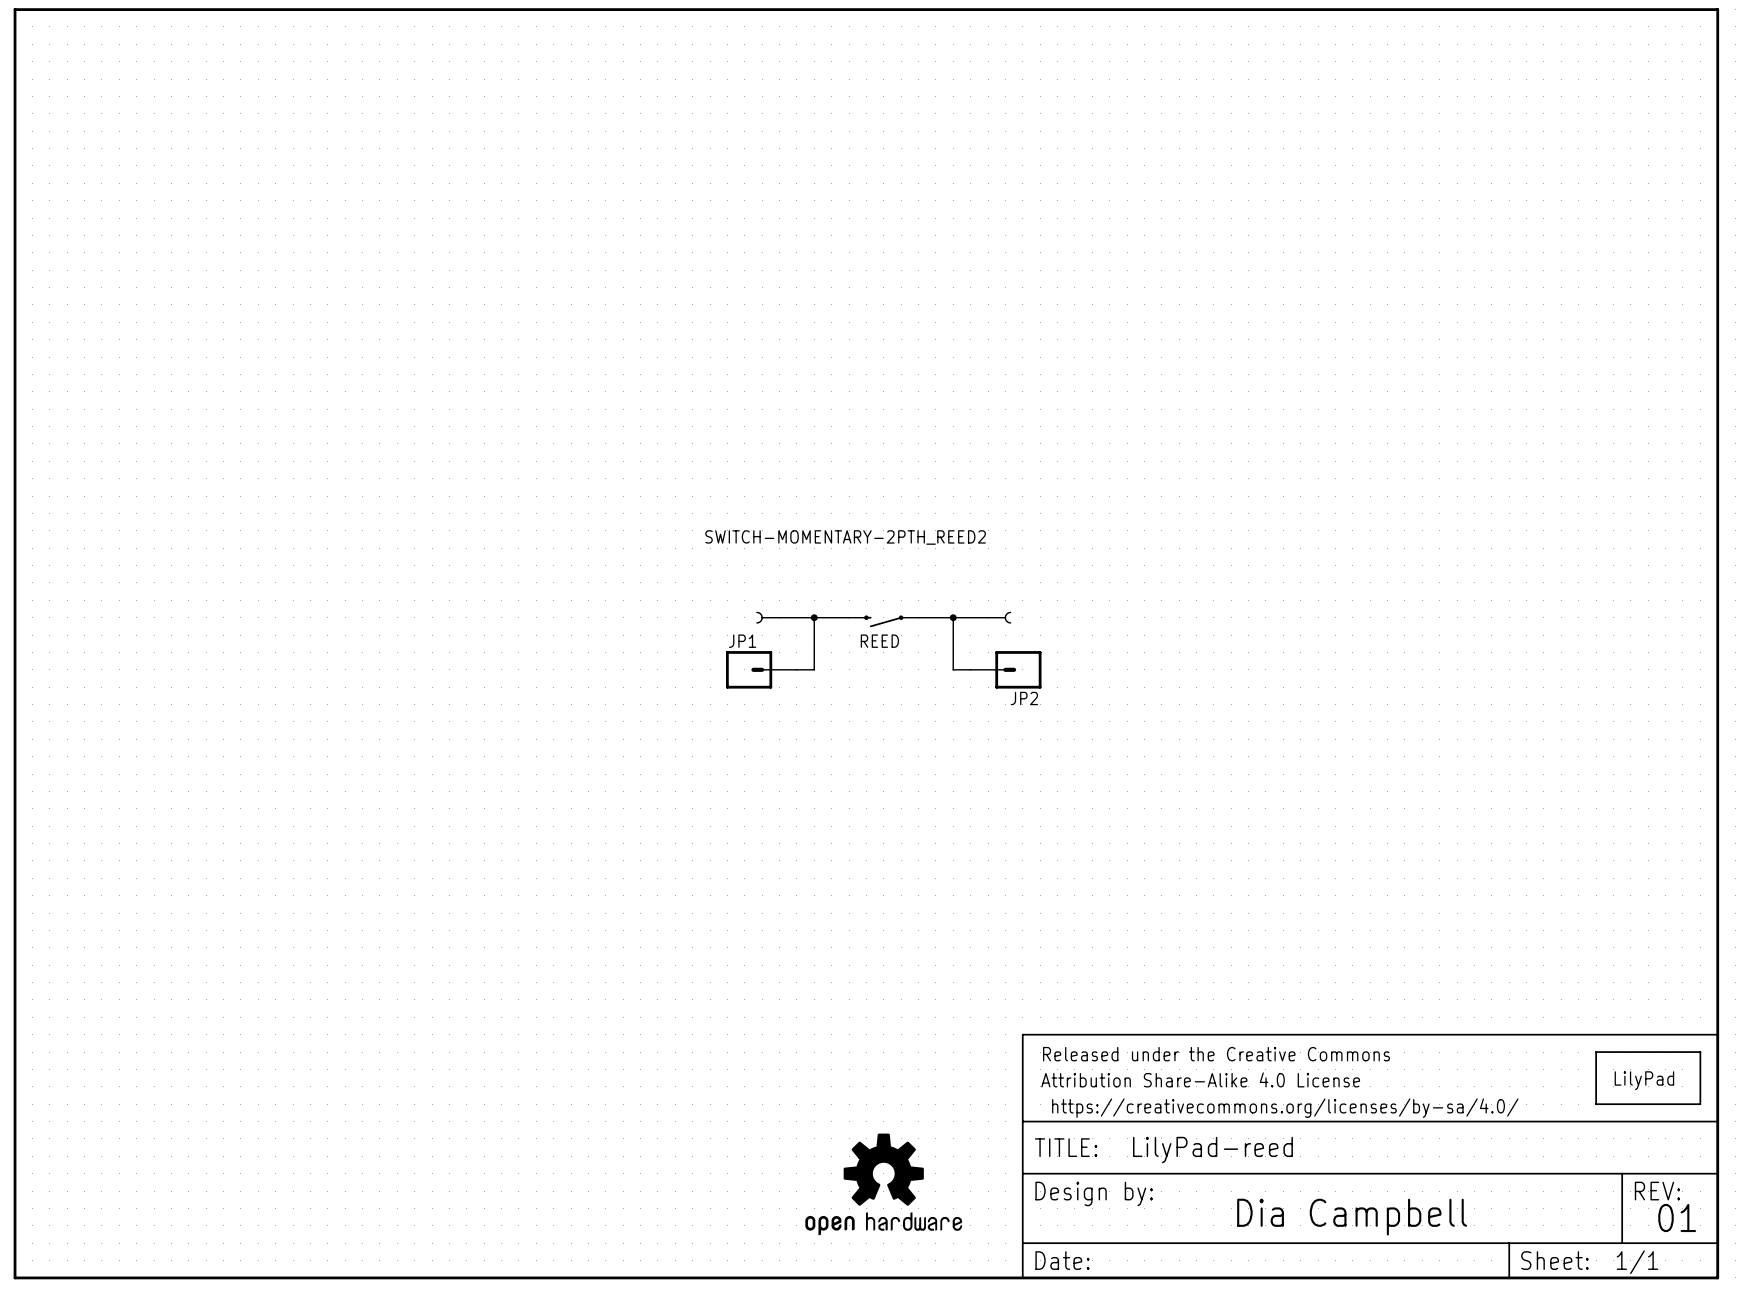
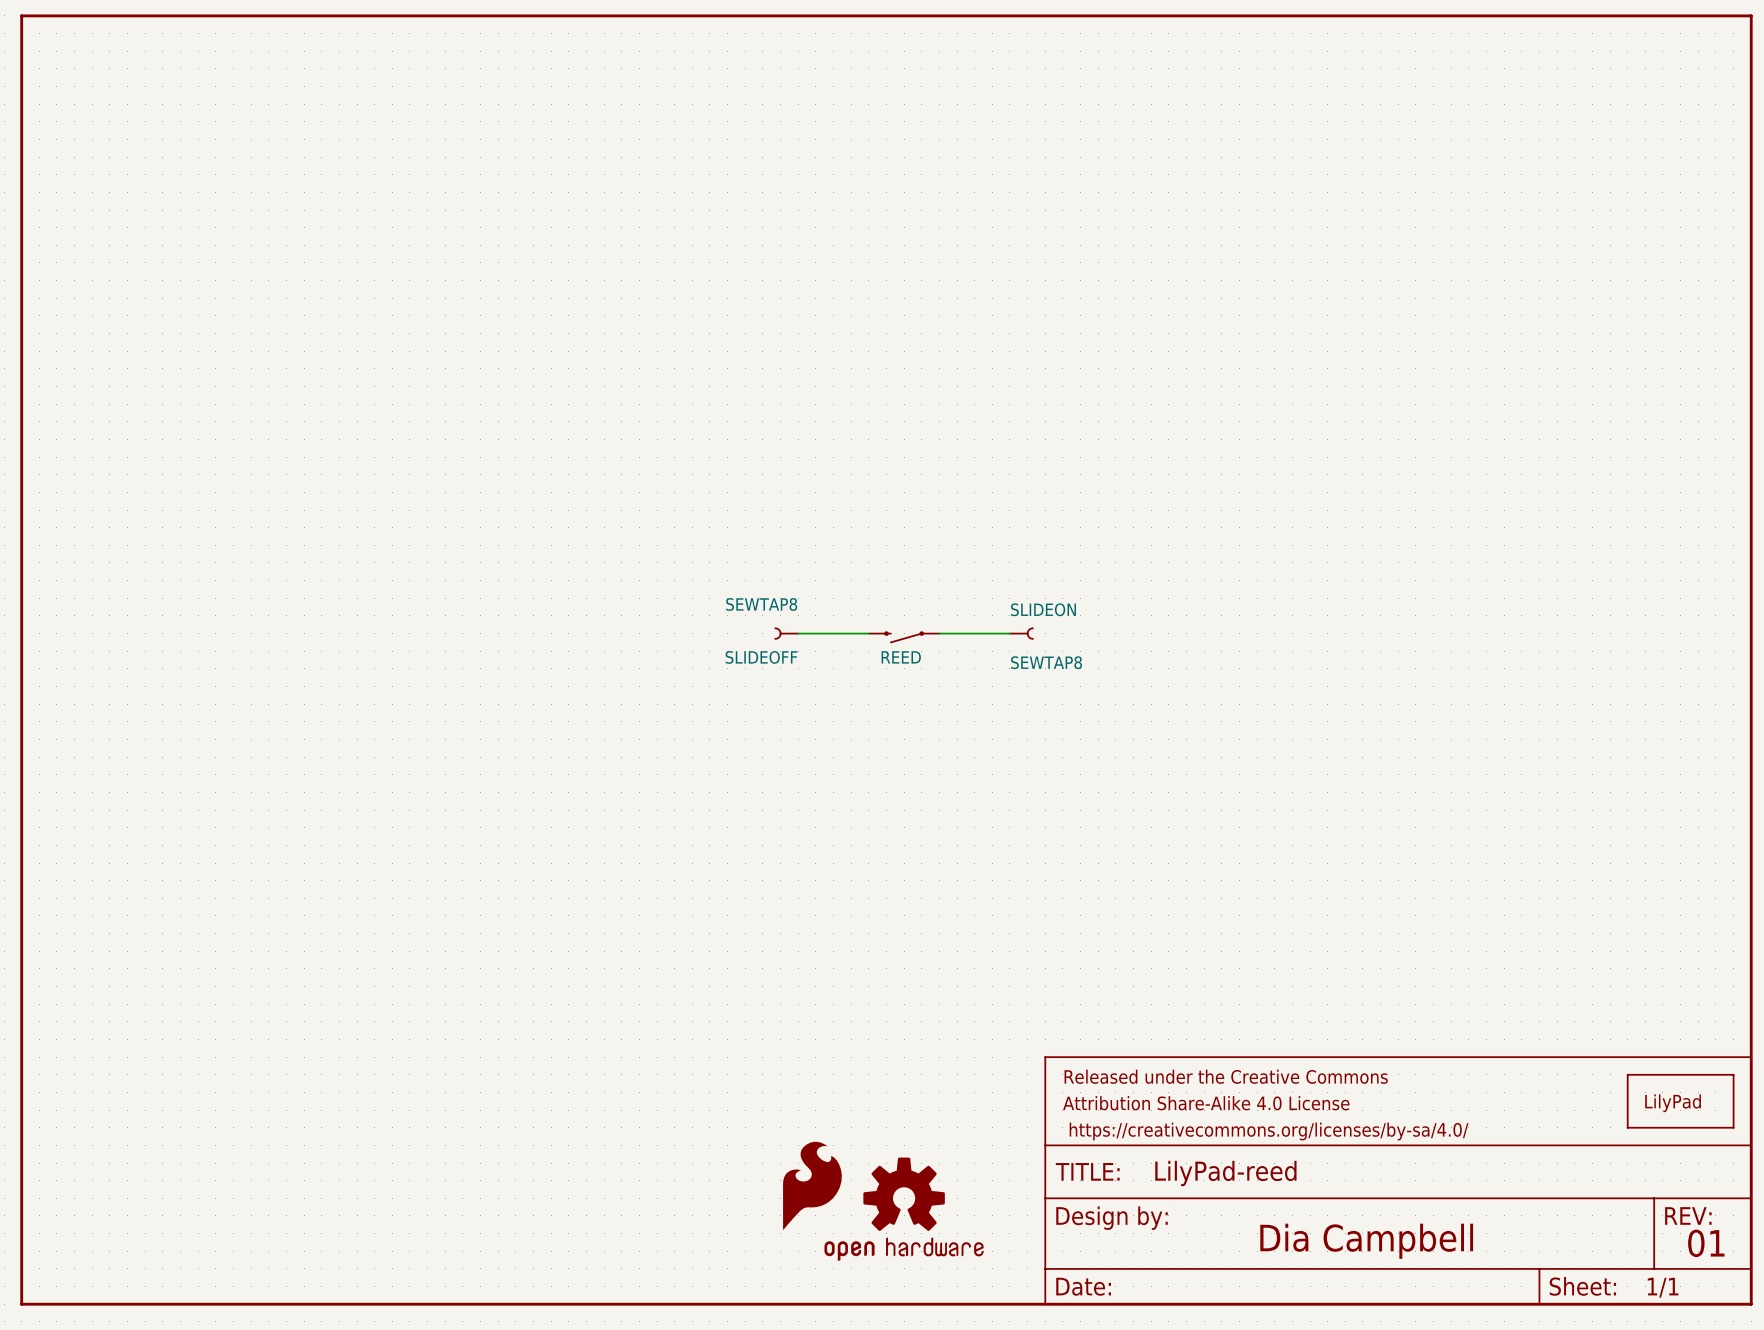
REED value: SWITCH-MOMENTARY-2PTH_REED2 (845, 537) -> none
SLIDEOFF value: none -> SEWTAP8 (761, 604)
SLIDEON name: none -> SLIDEON (1043, 609)
wire: (814, 617) (814, 669) (796, 669) -> none
junction: (814, 617) -> none
wire: (953, 617) (953, 669) (970, 669) -> none
junction: (953, 617) -> none
SLIDEOFF name: none -> SLIDEOFF (761, 657)
SLIDEON value: none -> SEWTAP8 (1046, 662)
JP1: (761, 669) -> none
JP2: (1006, 669) -> none
part: none -> (812, 1185)

